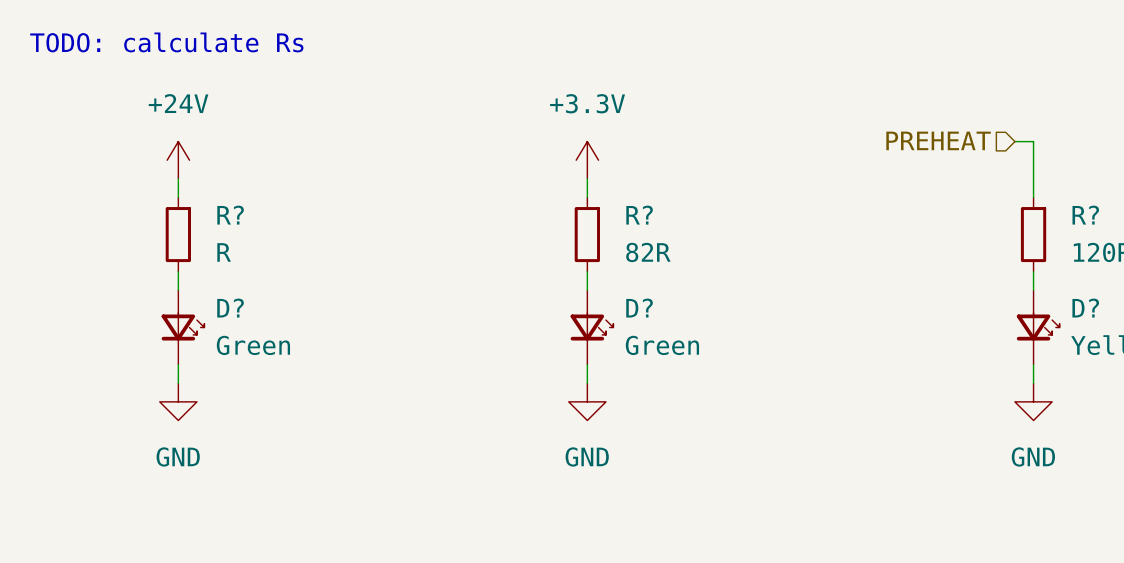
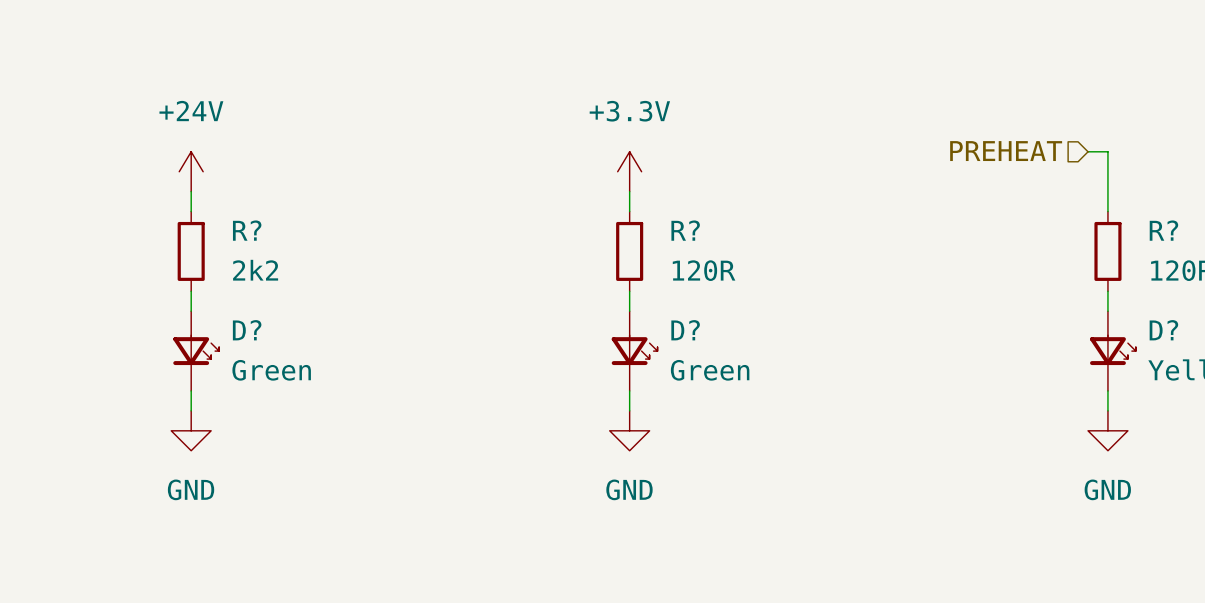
text: TODO: calculate Rs (166, 42) -> none
R? value: R (224, 252) -> 2k2 (255, 270)
R? value: 82R (648, 252) -> 120R (704, 270)

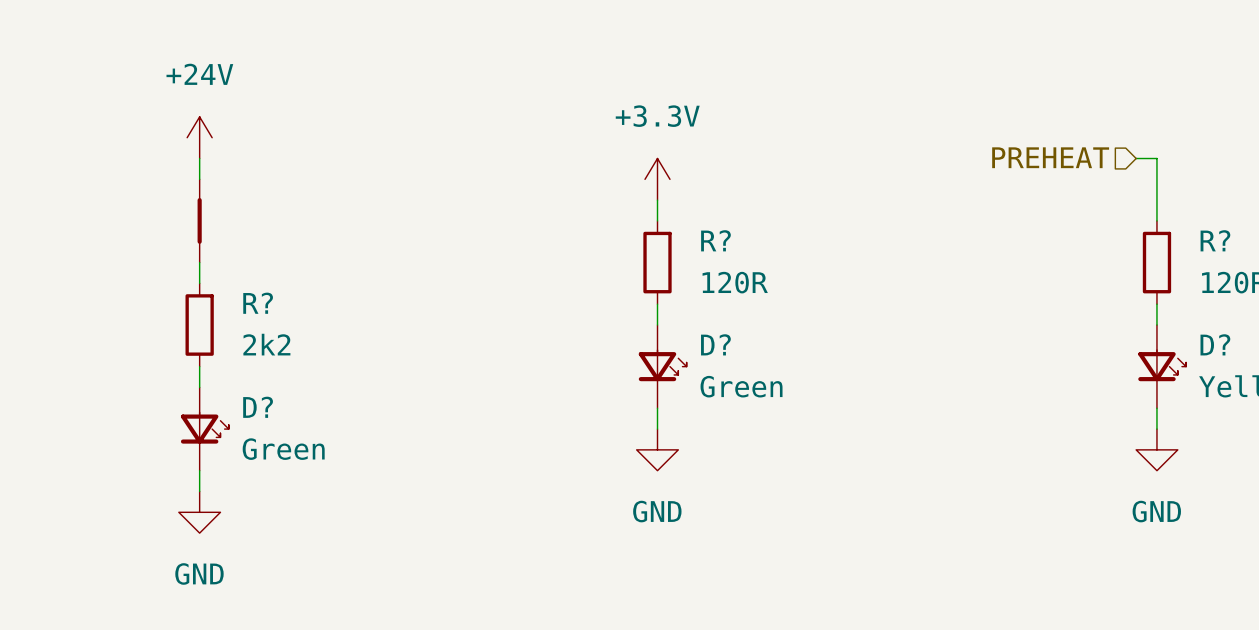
power symbol position: +24V (191, 171) -> +24V (199, 137)
part: none -> (199, 220)
R? position: (191, 251) -> (199, 325)
wire: (191, 291) (191, 311) -> (199, 262) (199, 283)
D? position: (196, 351) -> (204, 429)
power symbol position: GND (191, 430) -> GND (199, 512)
wire: none -> (199, 470) (199, 491)

